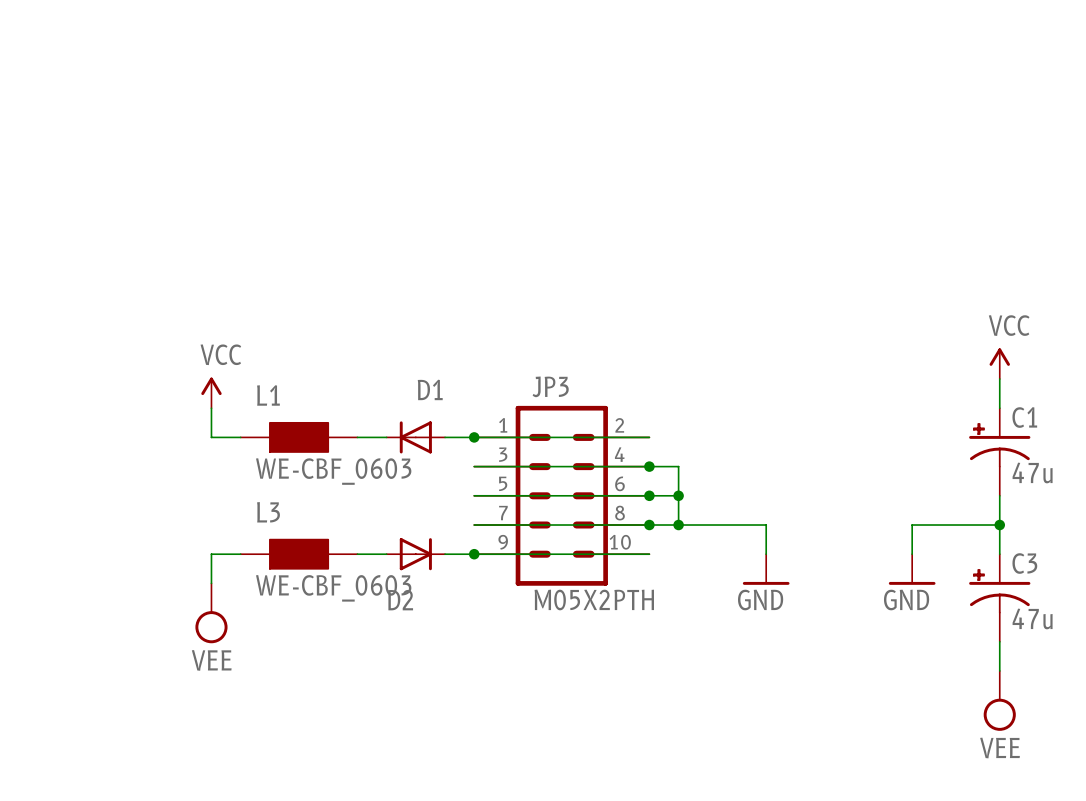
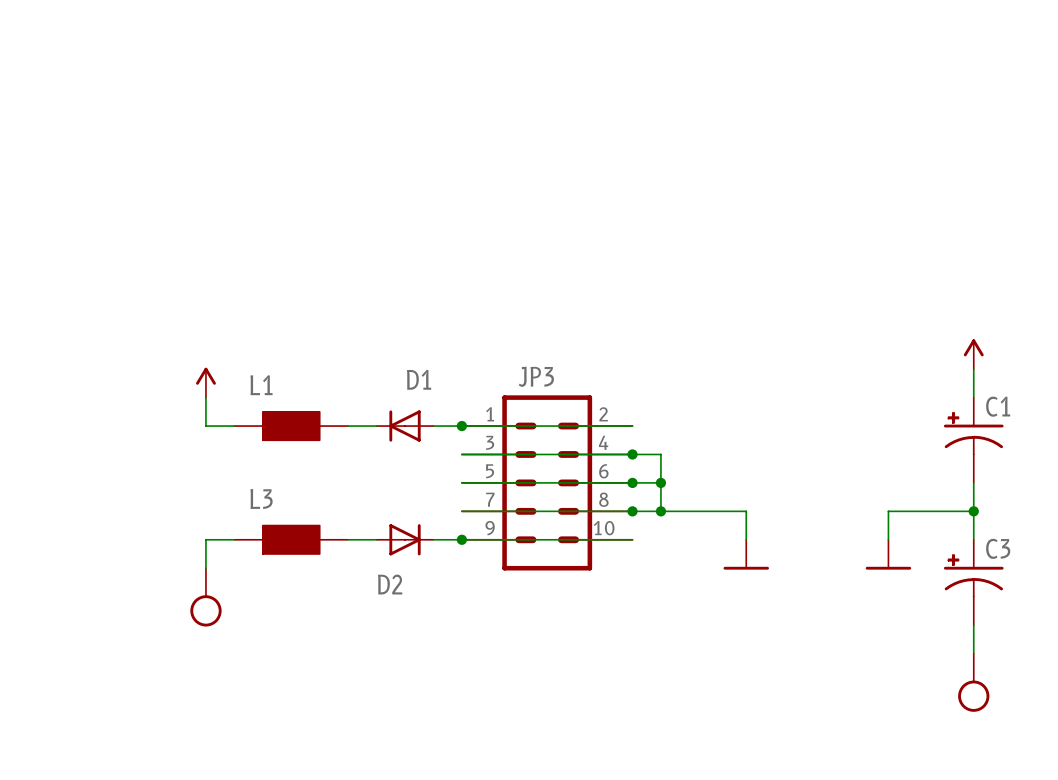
power symbol text: VCC (1009, 325) -> none
power symbol text: VCC (220, 354) -> none
L1 value: WE-CBF_0603 (333, 471) -> none
C1 value: 47u (1032, 472) -> none
L3 value: WE-CBF_0603 (333, 588) -> none
JP3 value: M05X2PTH (594, 599) -> none
power symbol text: GND (760, 599) -> none
power symbol text: GND (906, 599) -> none
C3 value: 47u (1032, 618) -> none
power symbol text: VEE (211, 660) -> none
power symbol text: VEE (1000, 748) -> none

